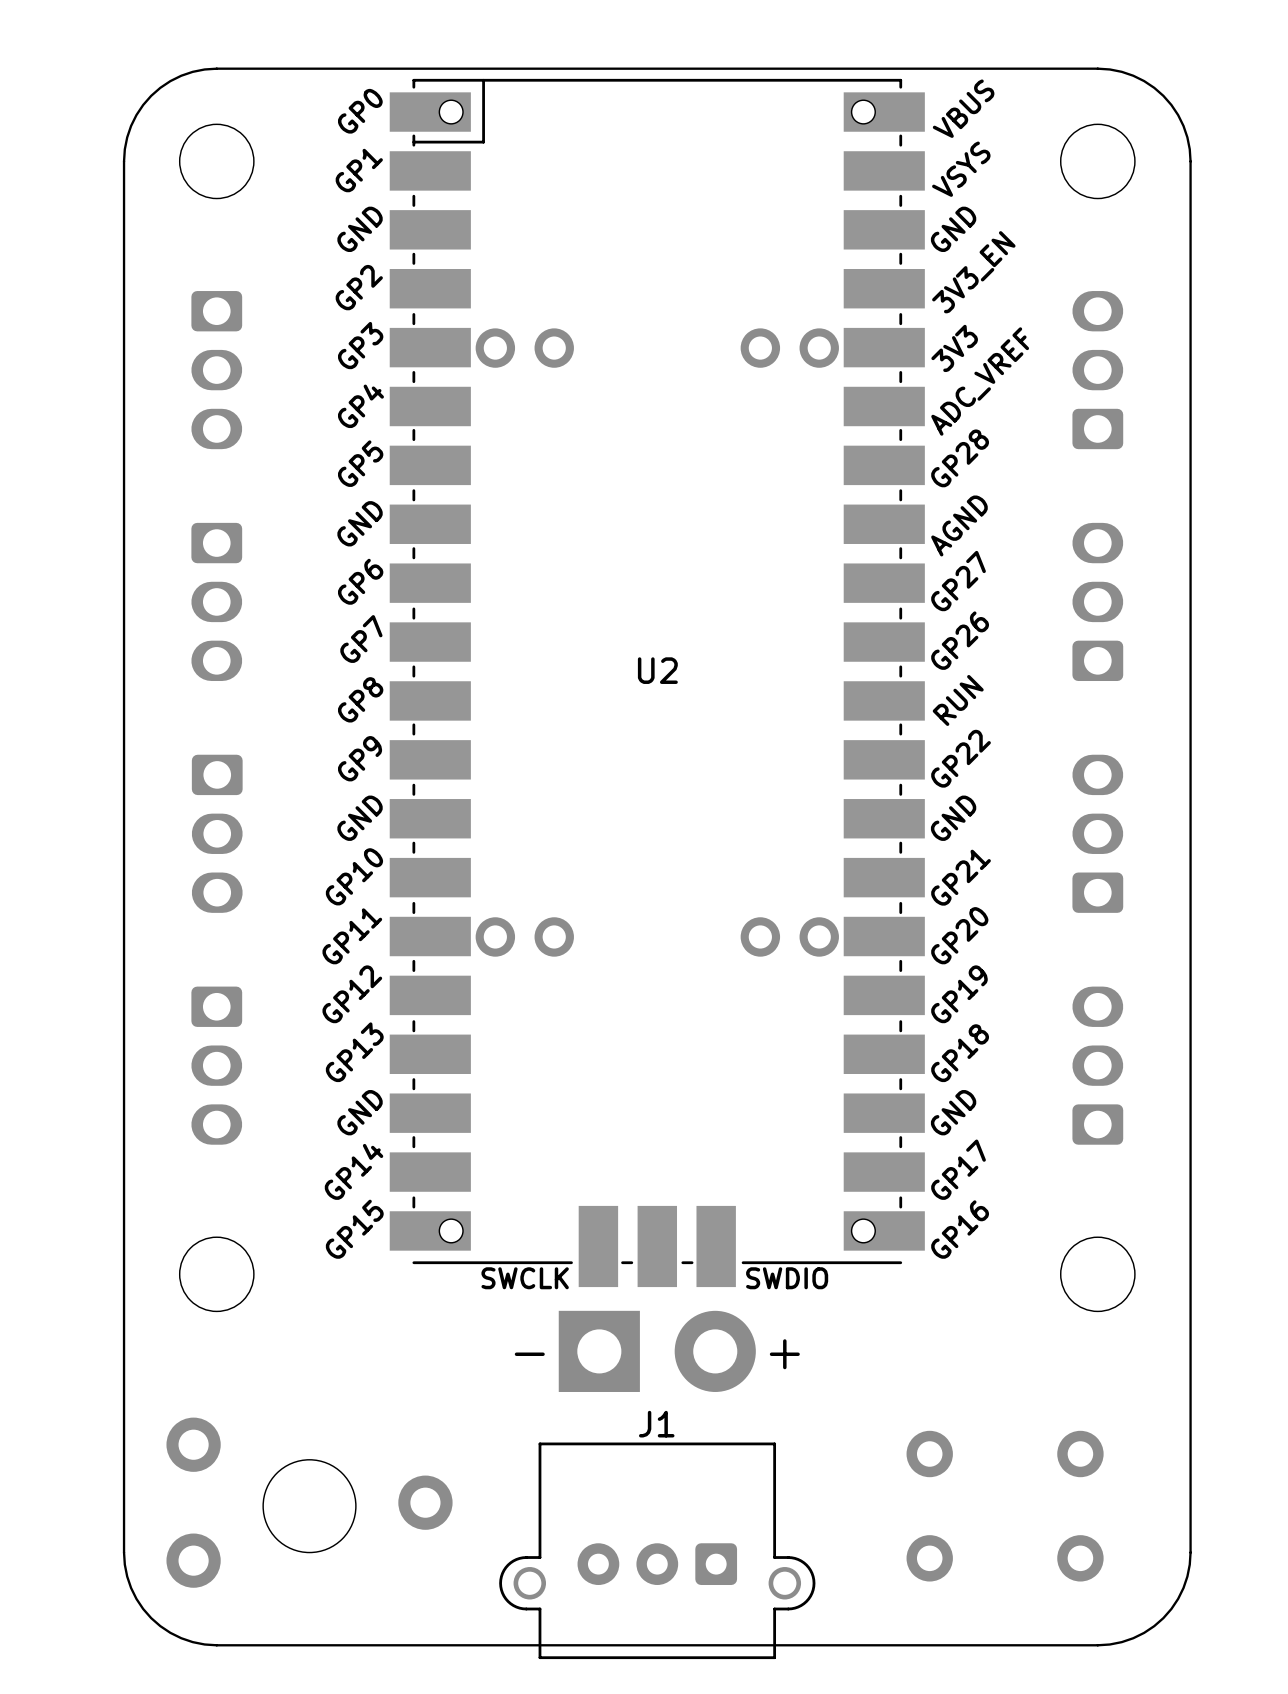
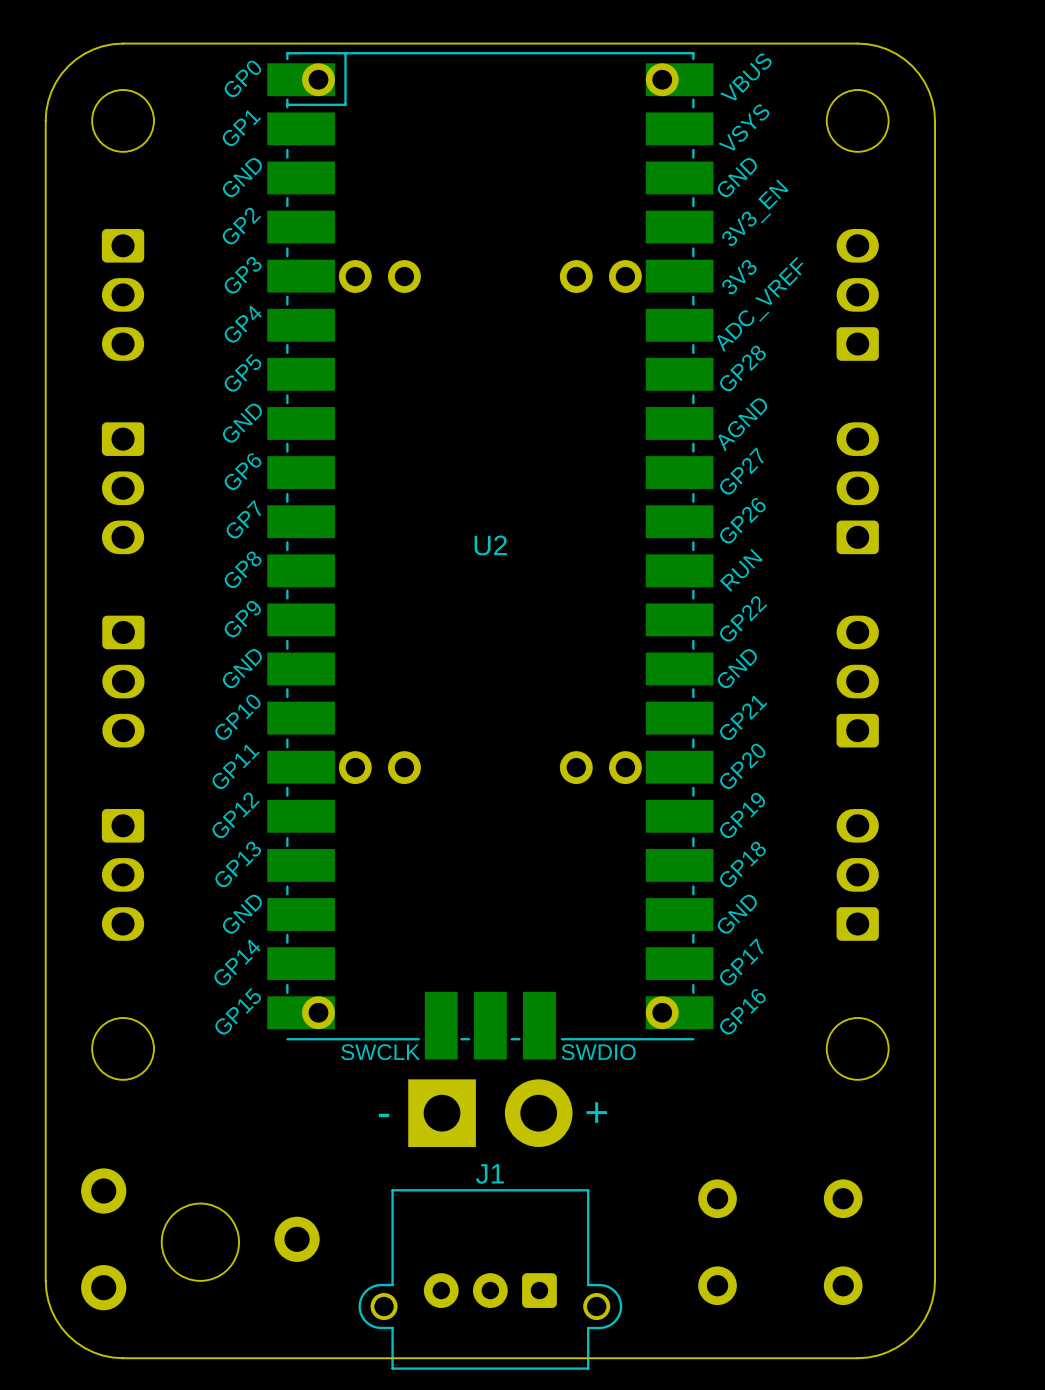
U2 footprint: [389, 78, 925, 1288] -> [267, 52, 714, 1060]

